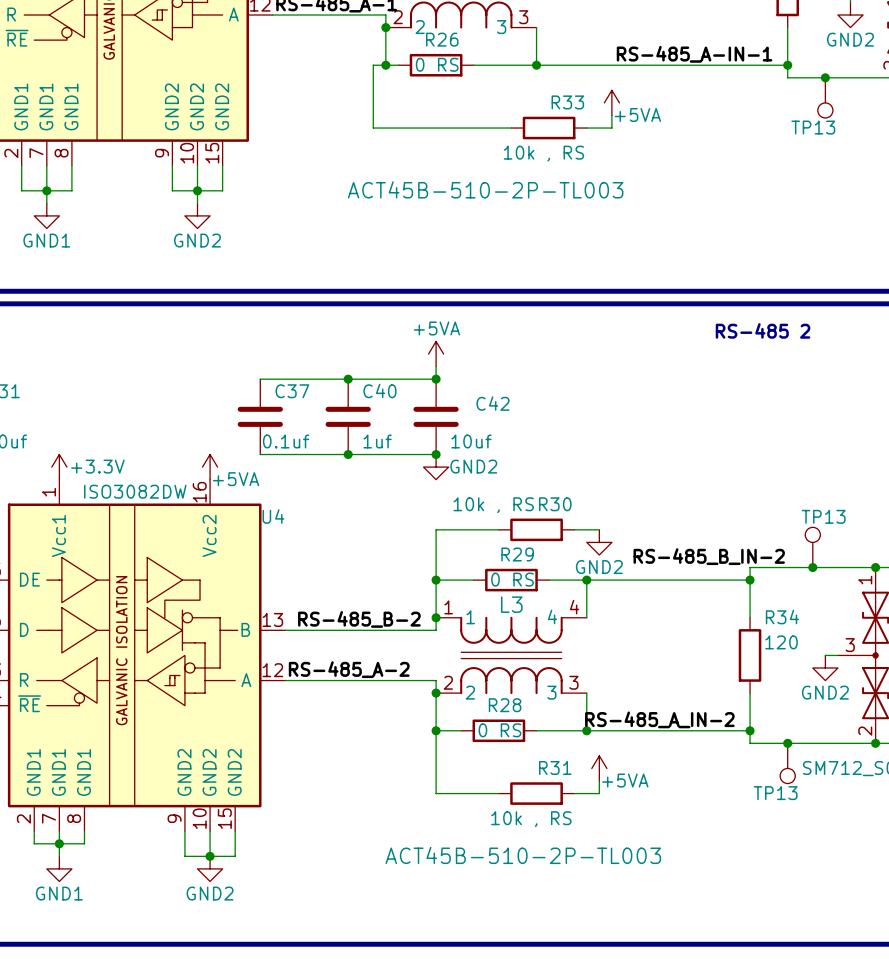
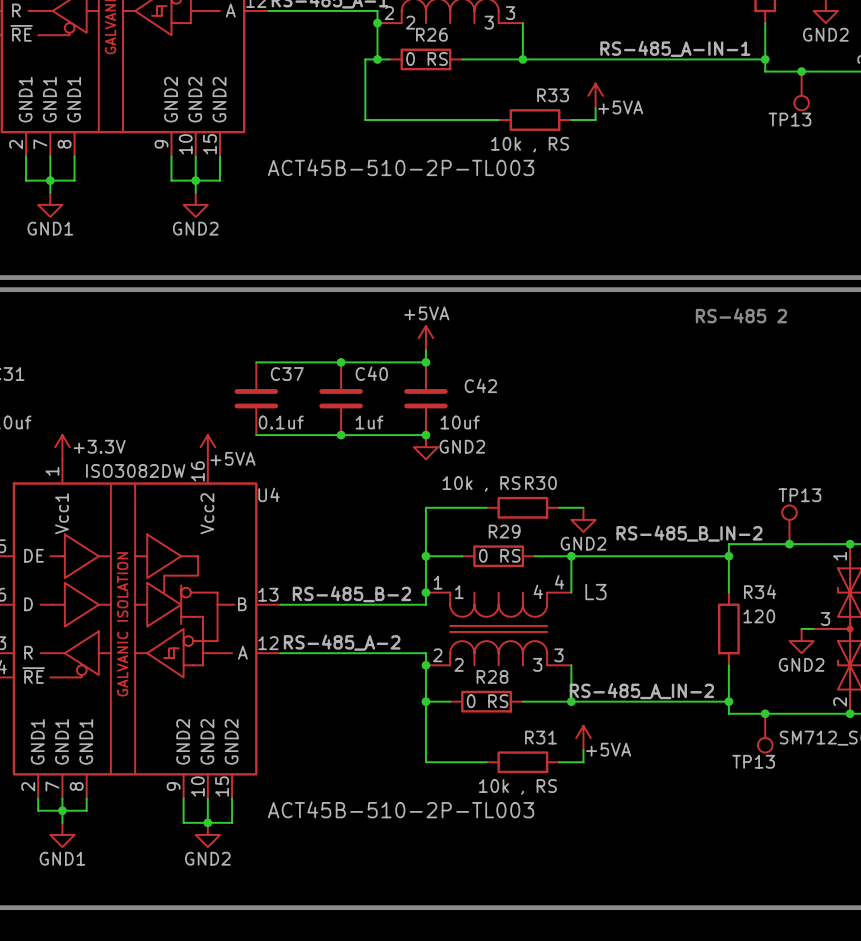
part value position: ACT45B-510-2P-TL003 (485, 189) -> ACT45B-510-2P-TL003 (401, 167)
L3 name position: L3 (511, 604) -> L3 (595, 592)
L3 value position: ACT45B-510-2P-TL003 (523, 855) -> ACT45B-510-2P-TL003 (401, 809)

